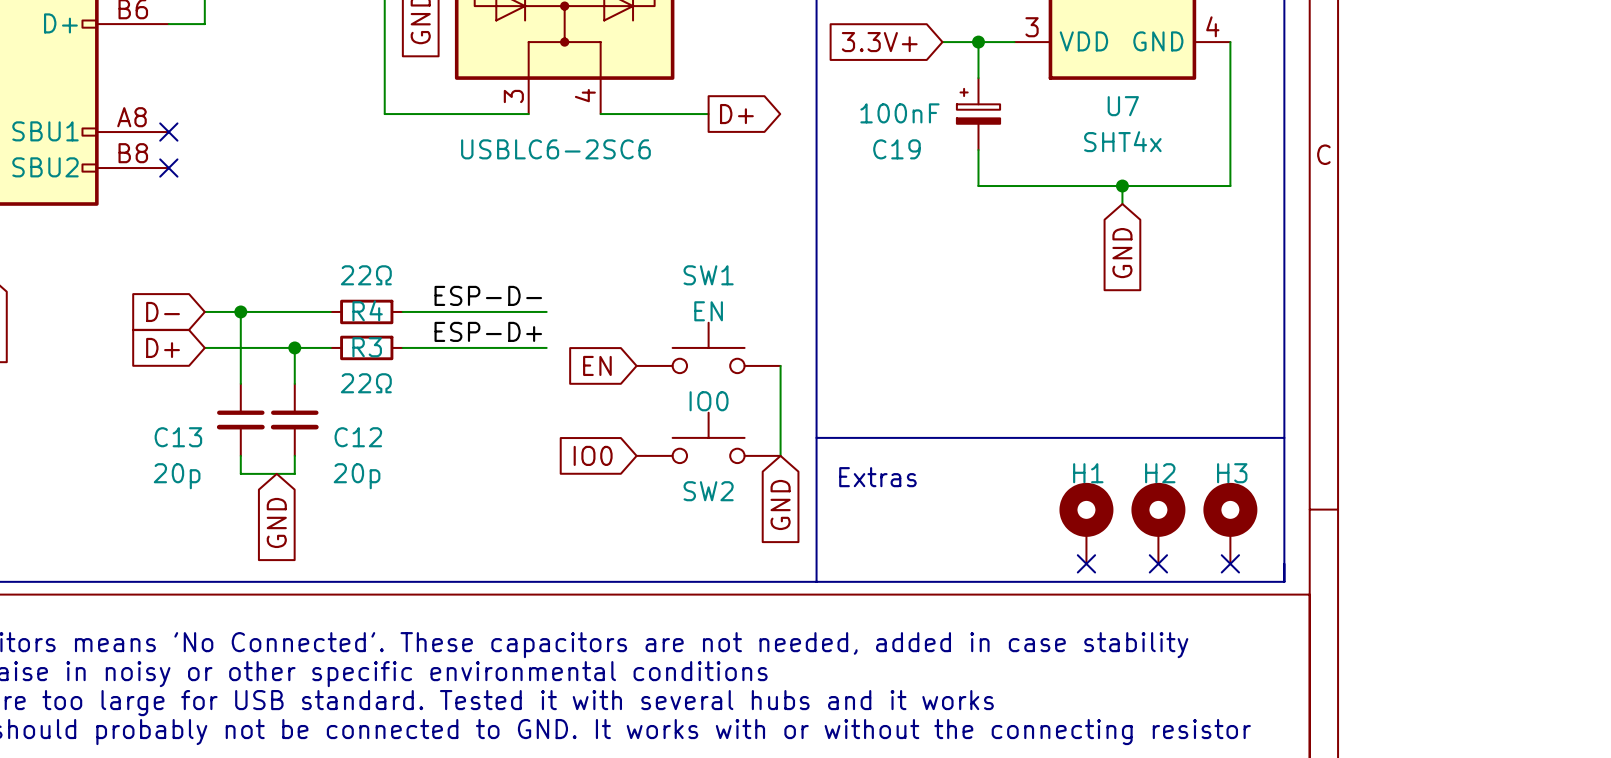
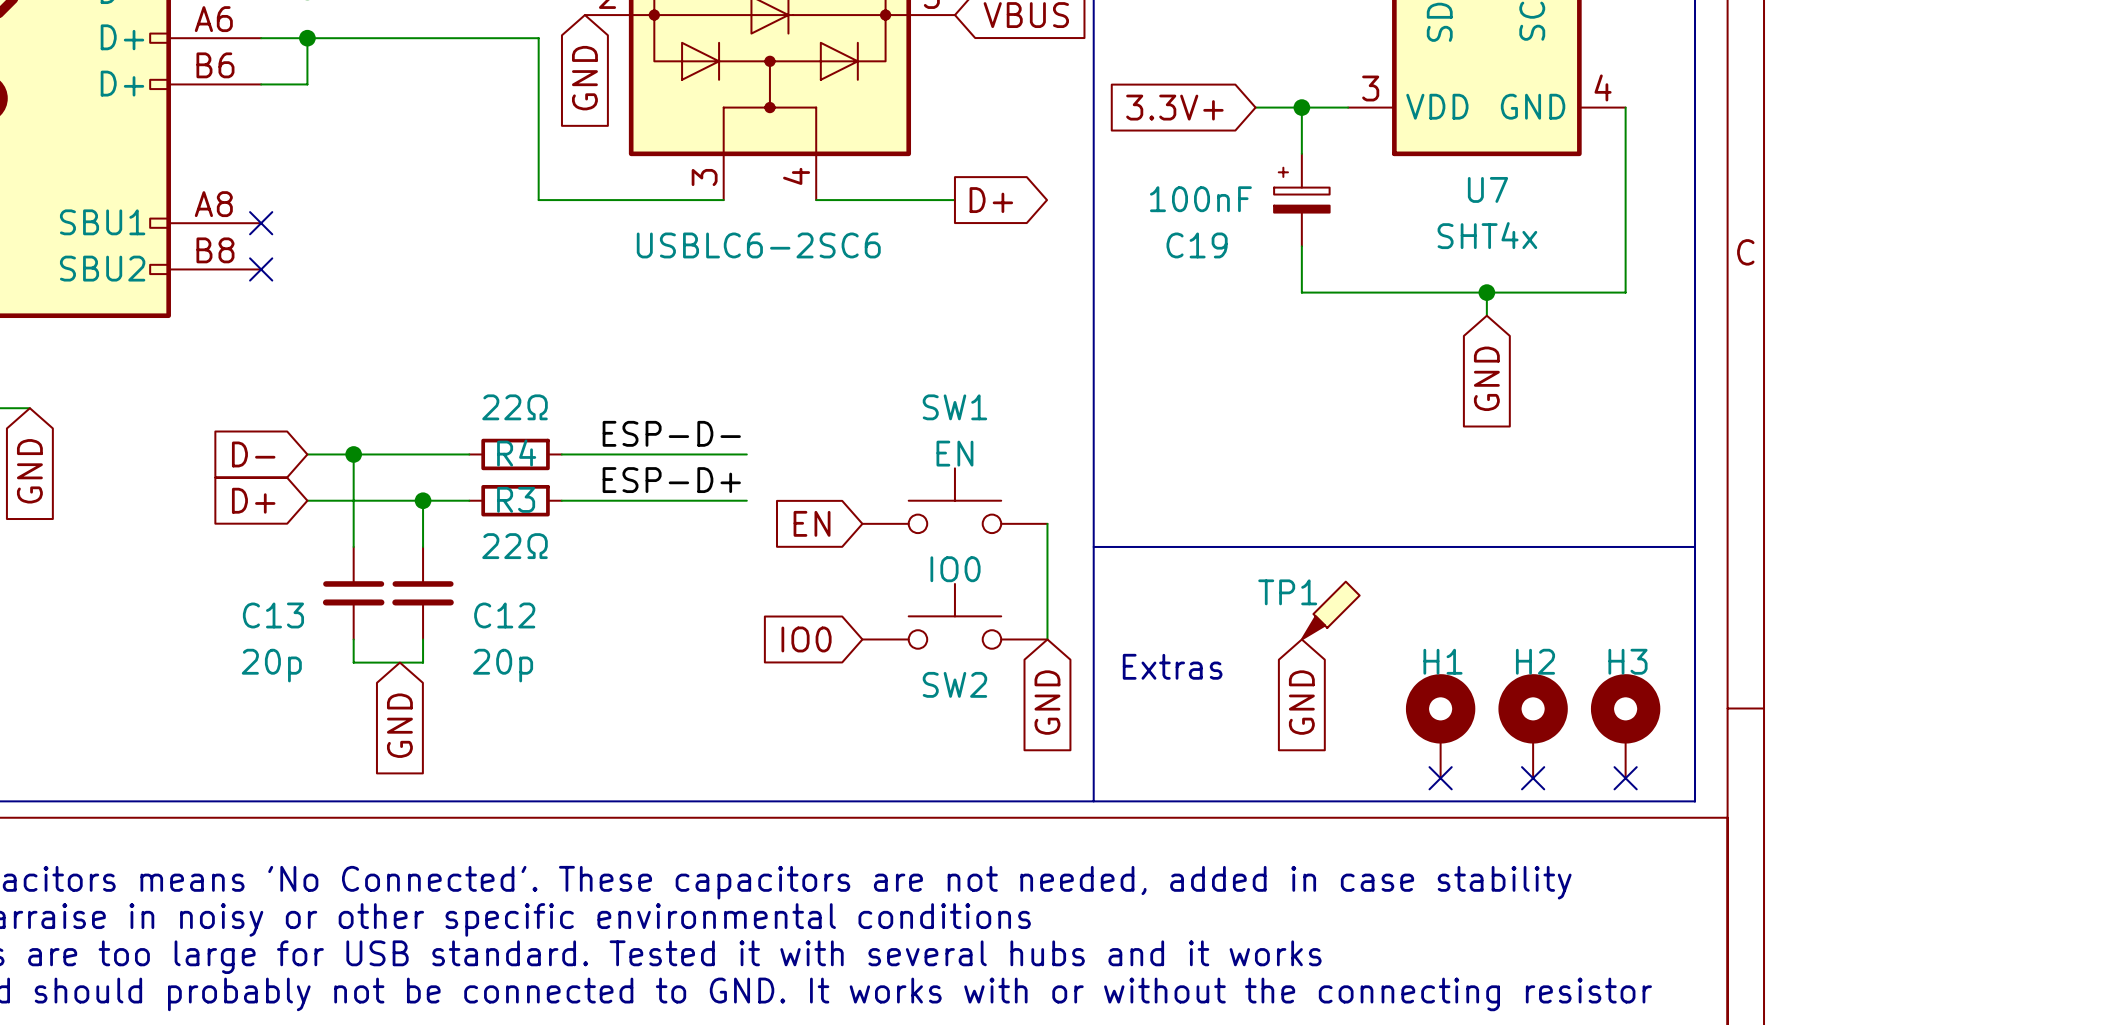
TP1: none -> (1330, 610)
line: (816, 437) (1284, 437) -> (1093, 546) (1695, 546)
global label: none -> GND (1301, 702)

